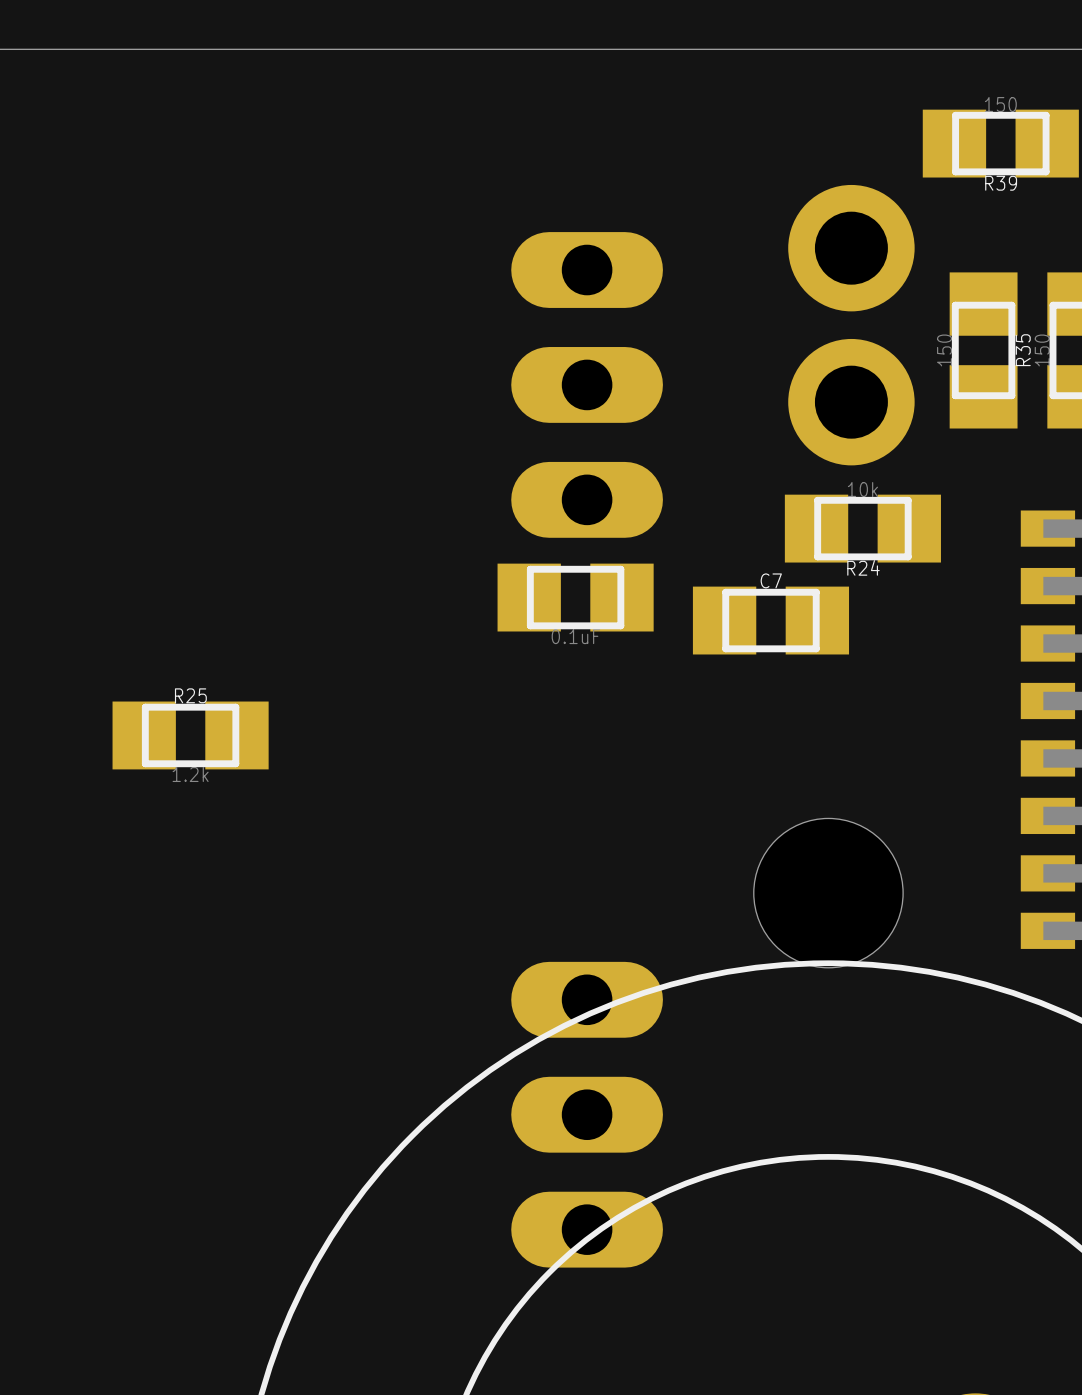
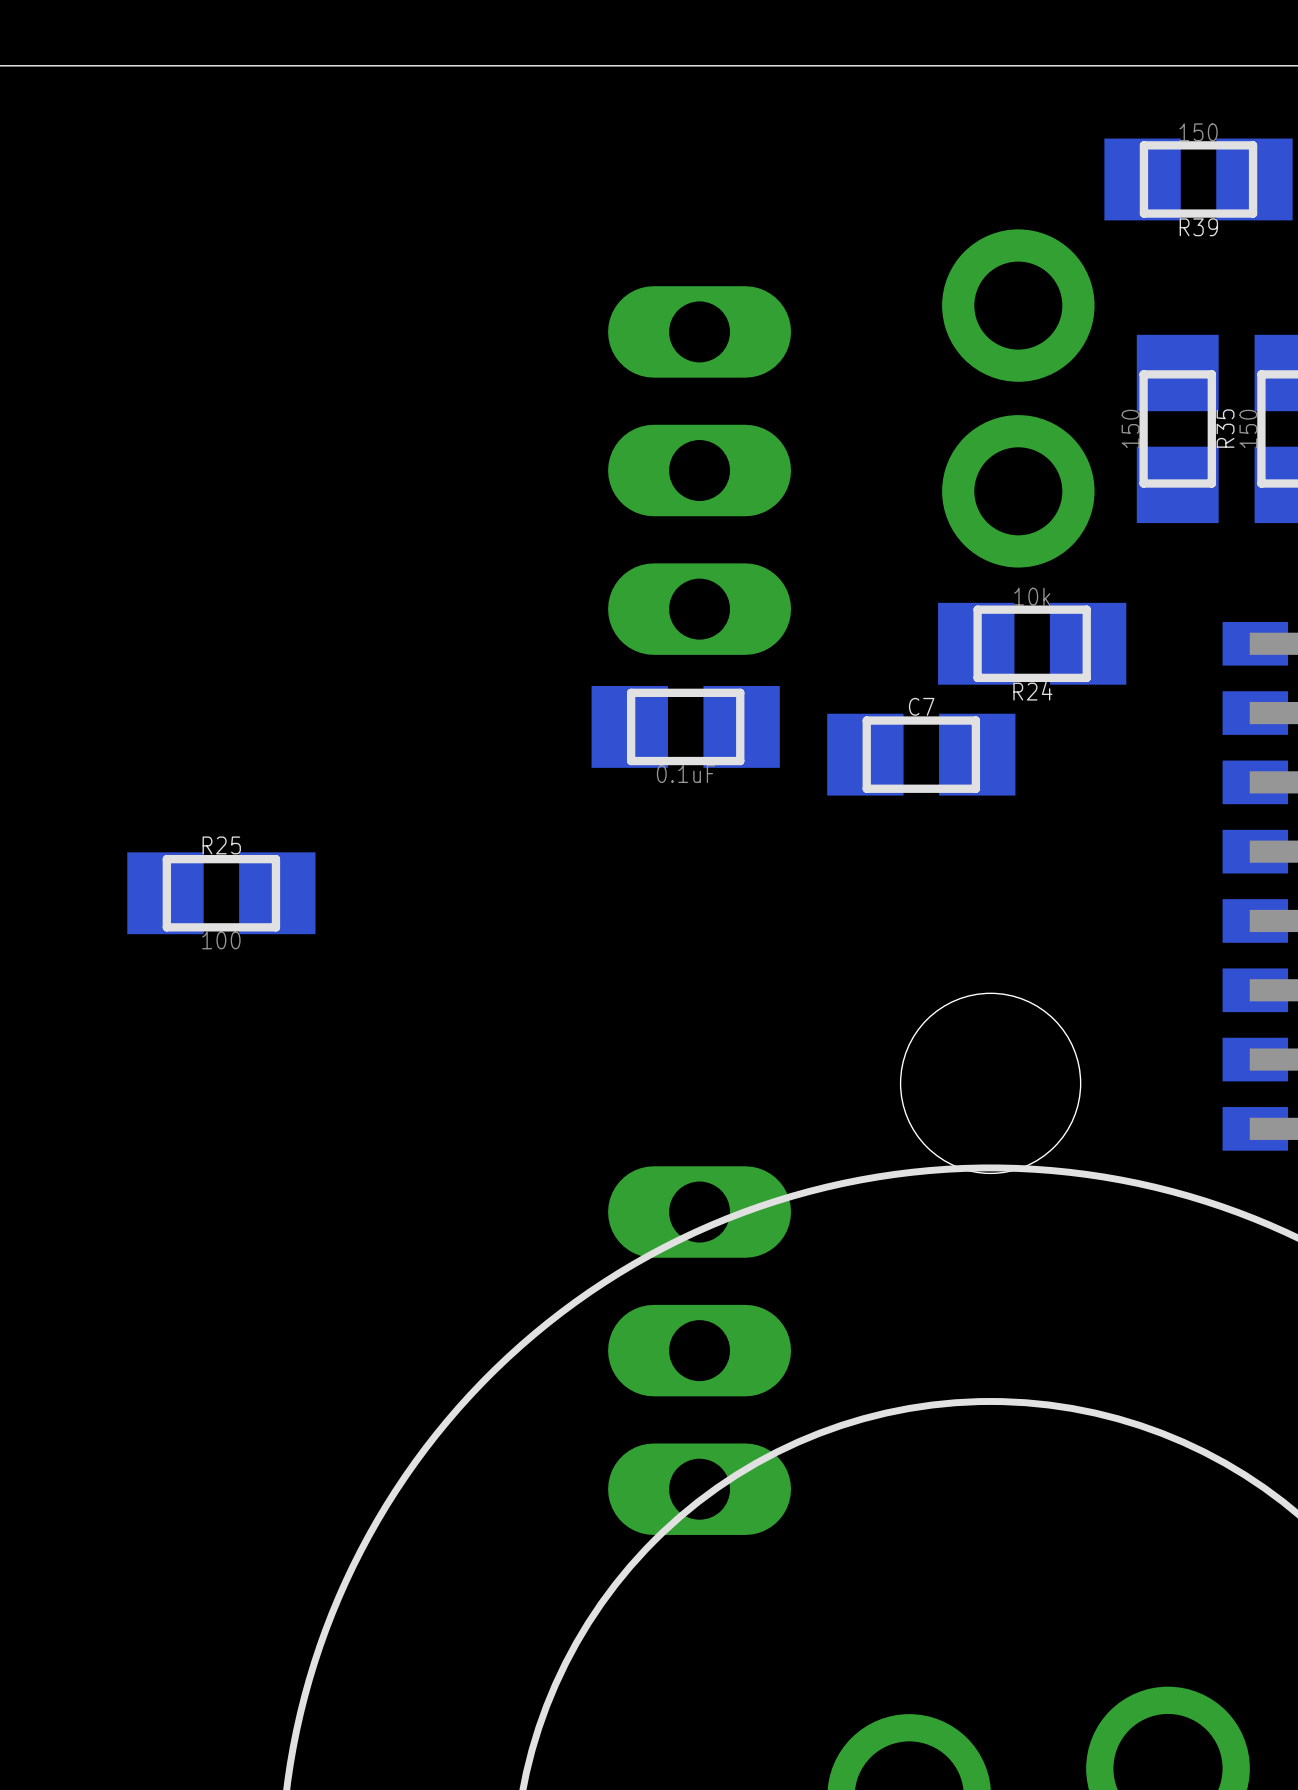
R25 value: 1.2k (190, 774) -> 100 (221, 940)

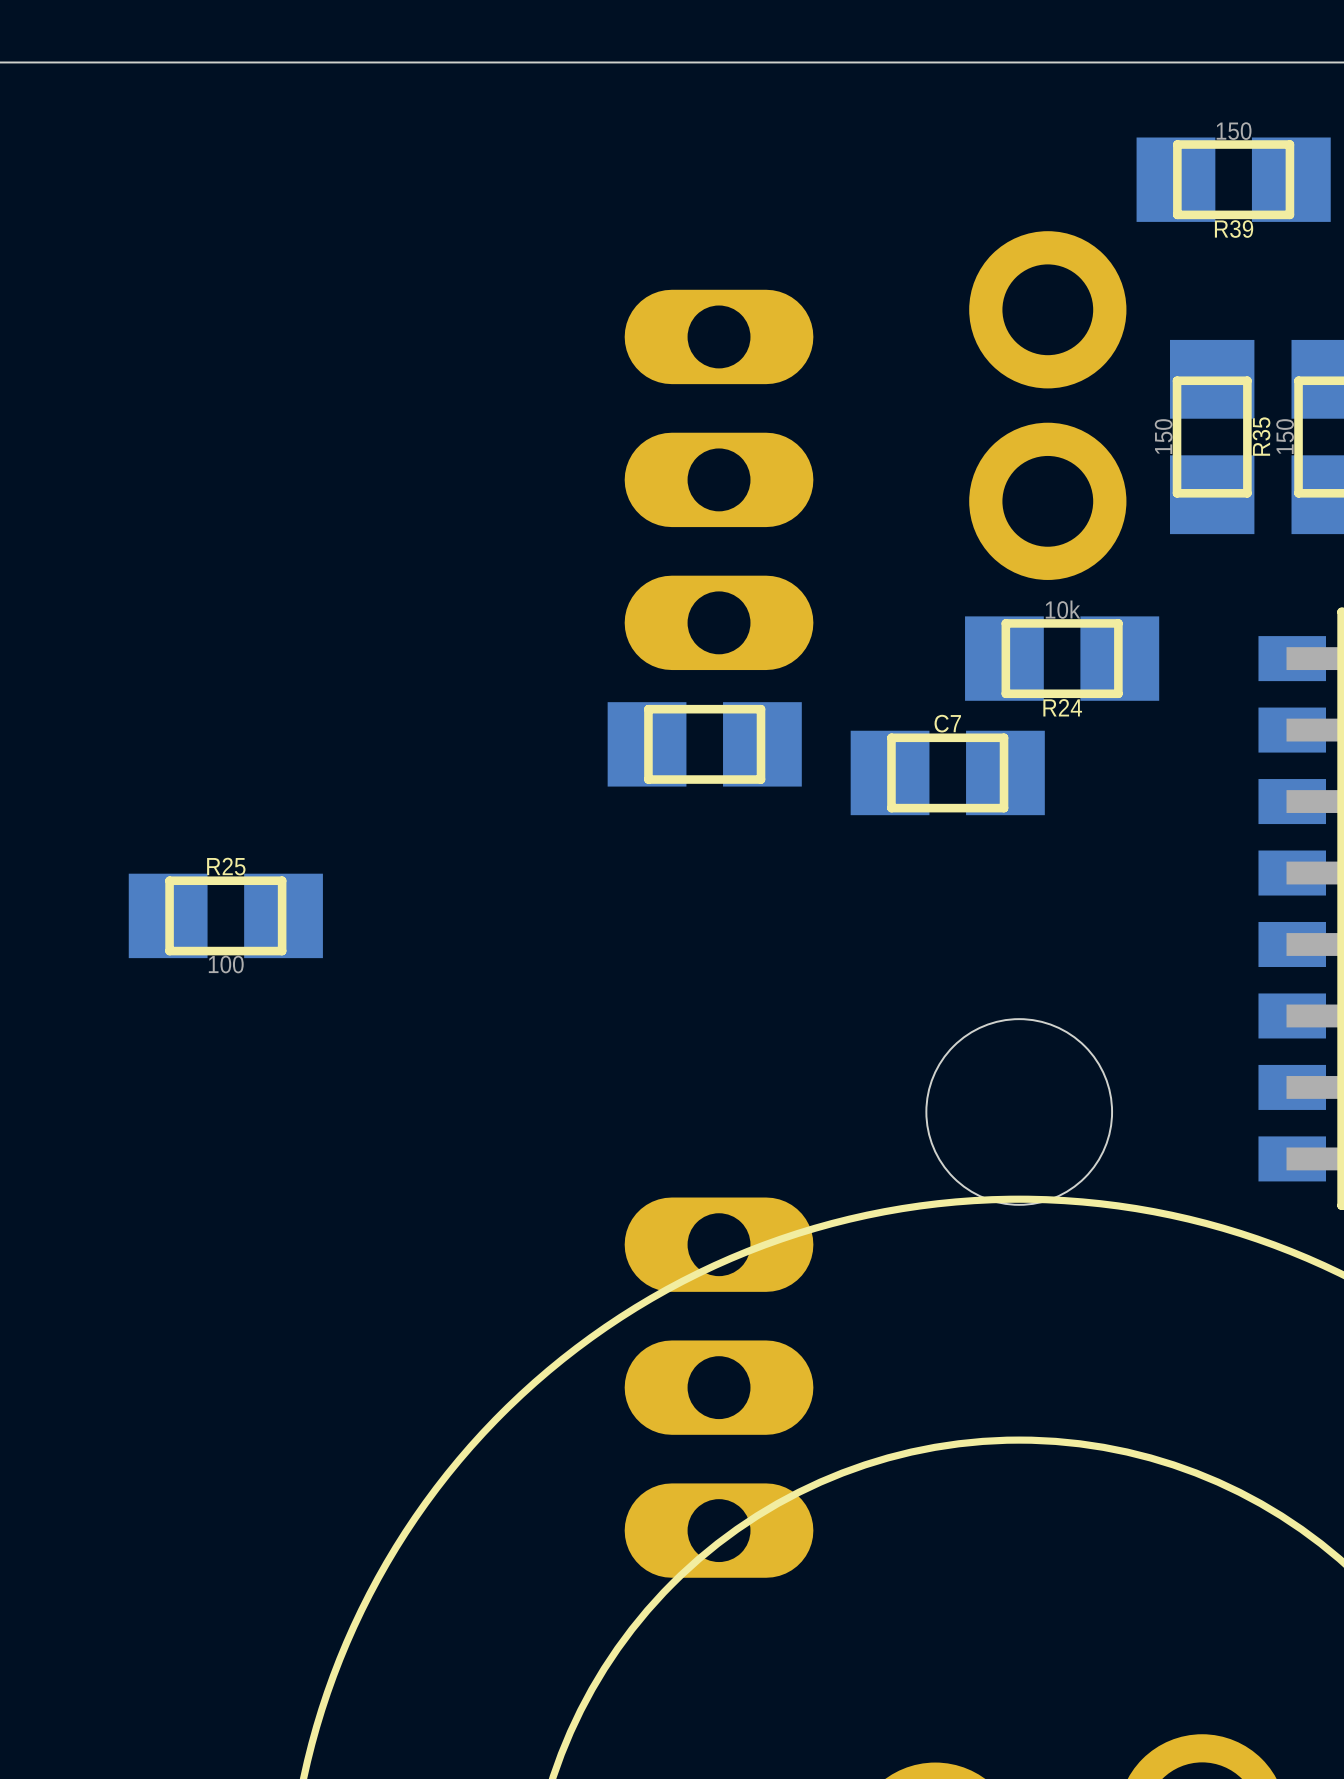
part value: 0.1uF (686, 774) -> none

